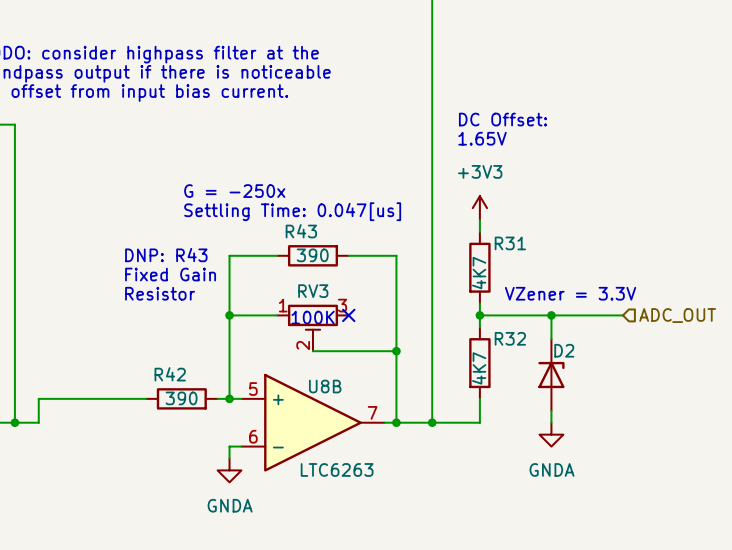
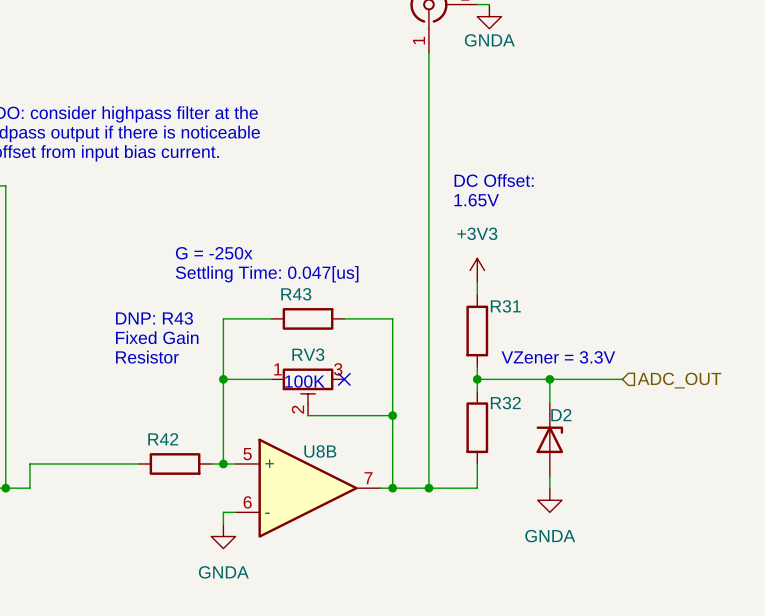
R43 value: 390 (312, 255) -> none
R31 value: 4K7 (479, 273) -> none
R32 value: 4K7 (479, 368) -> none
R42 value: 390 (181, 398) -> none
U8B value: LTC6263 (337, 469) -> none

